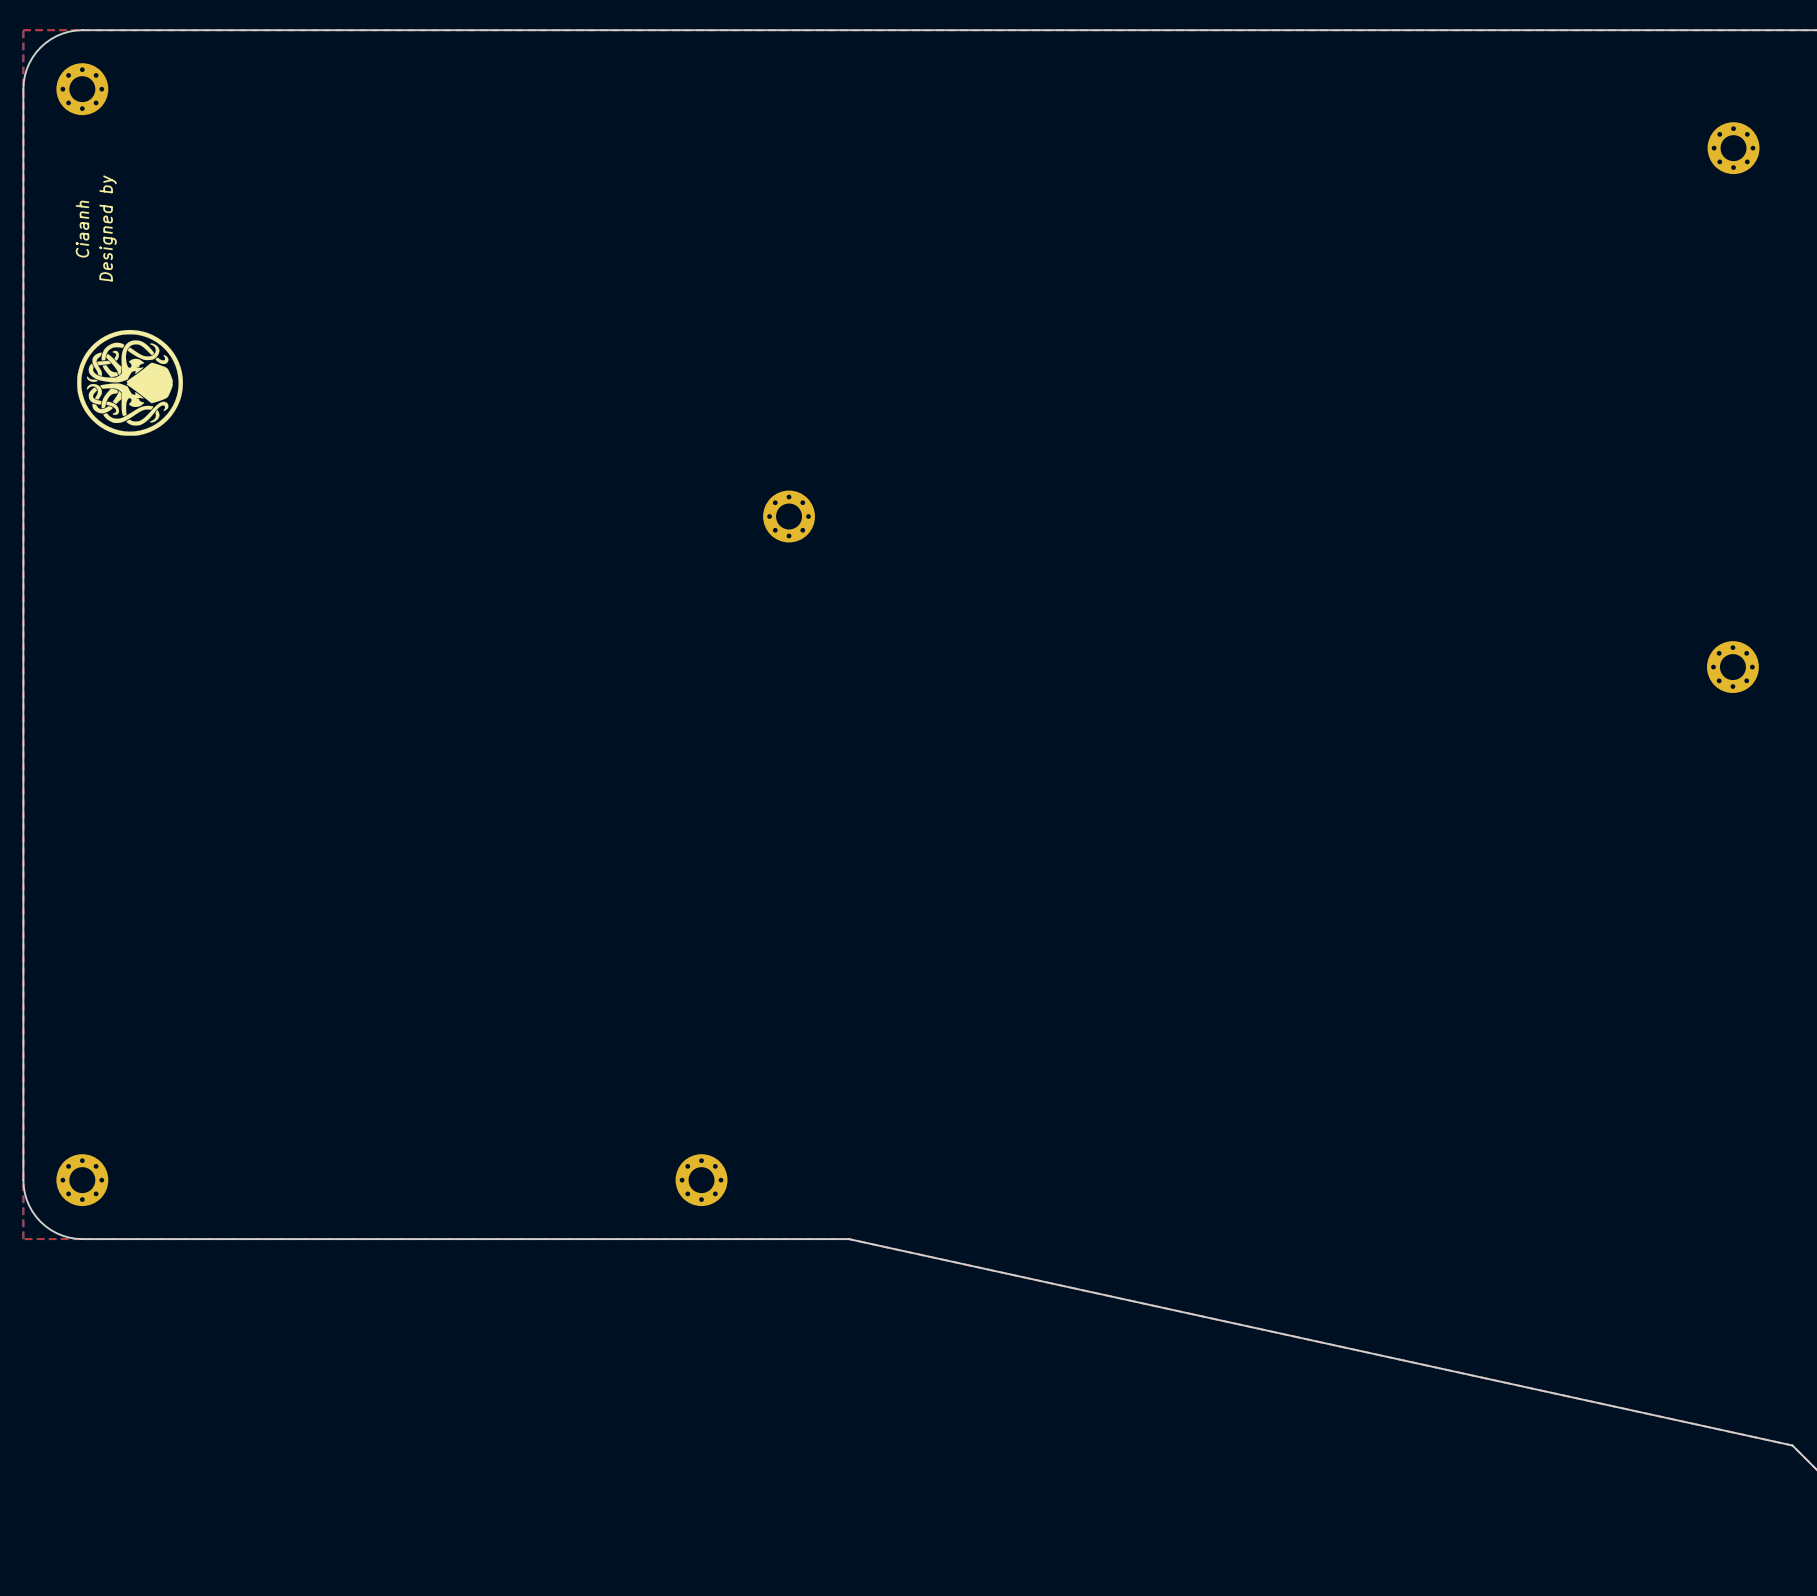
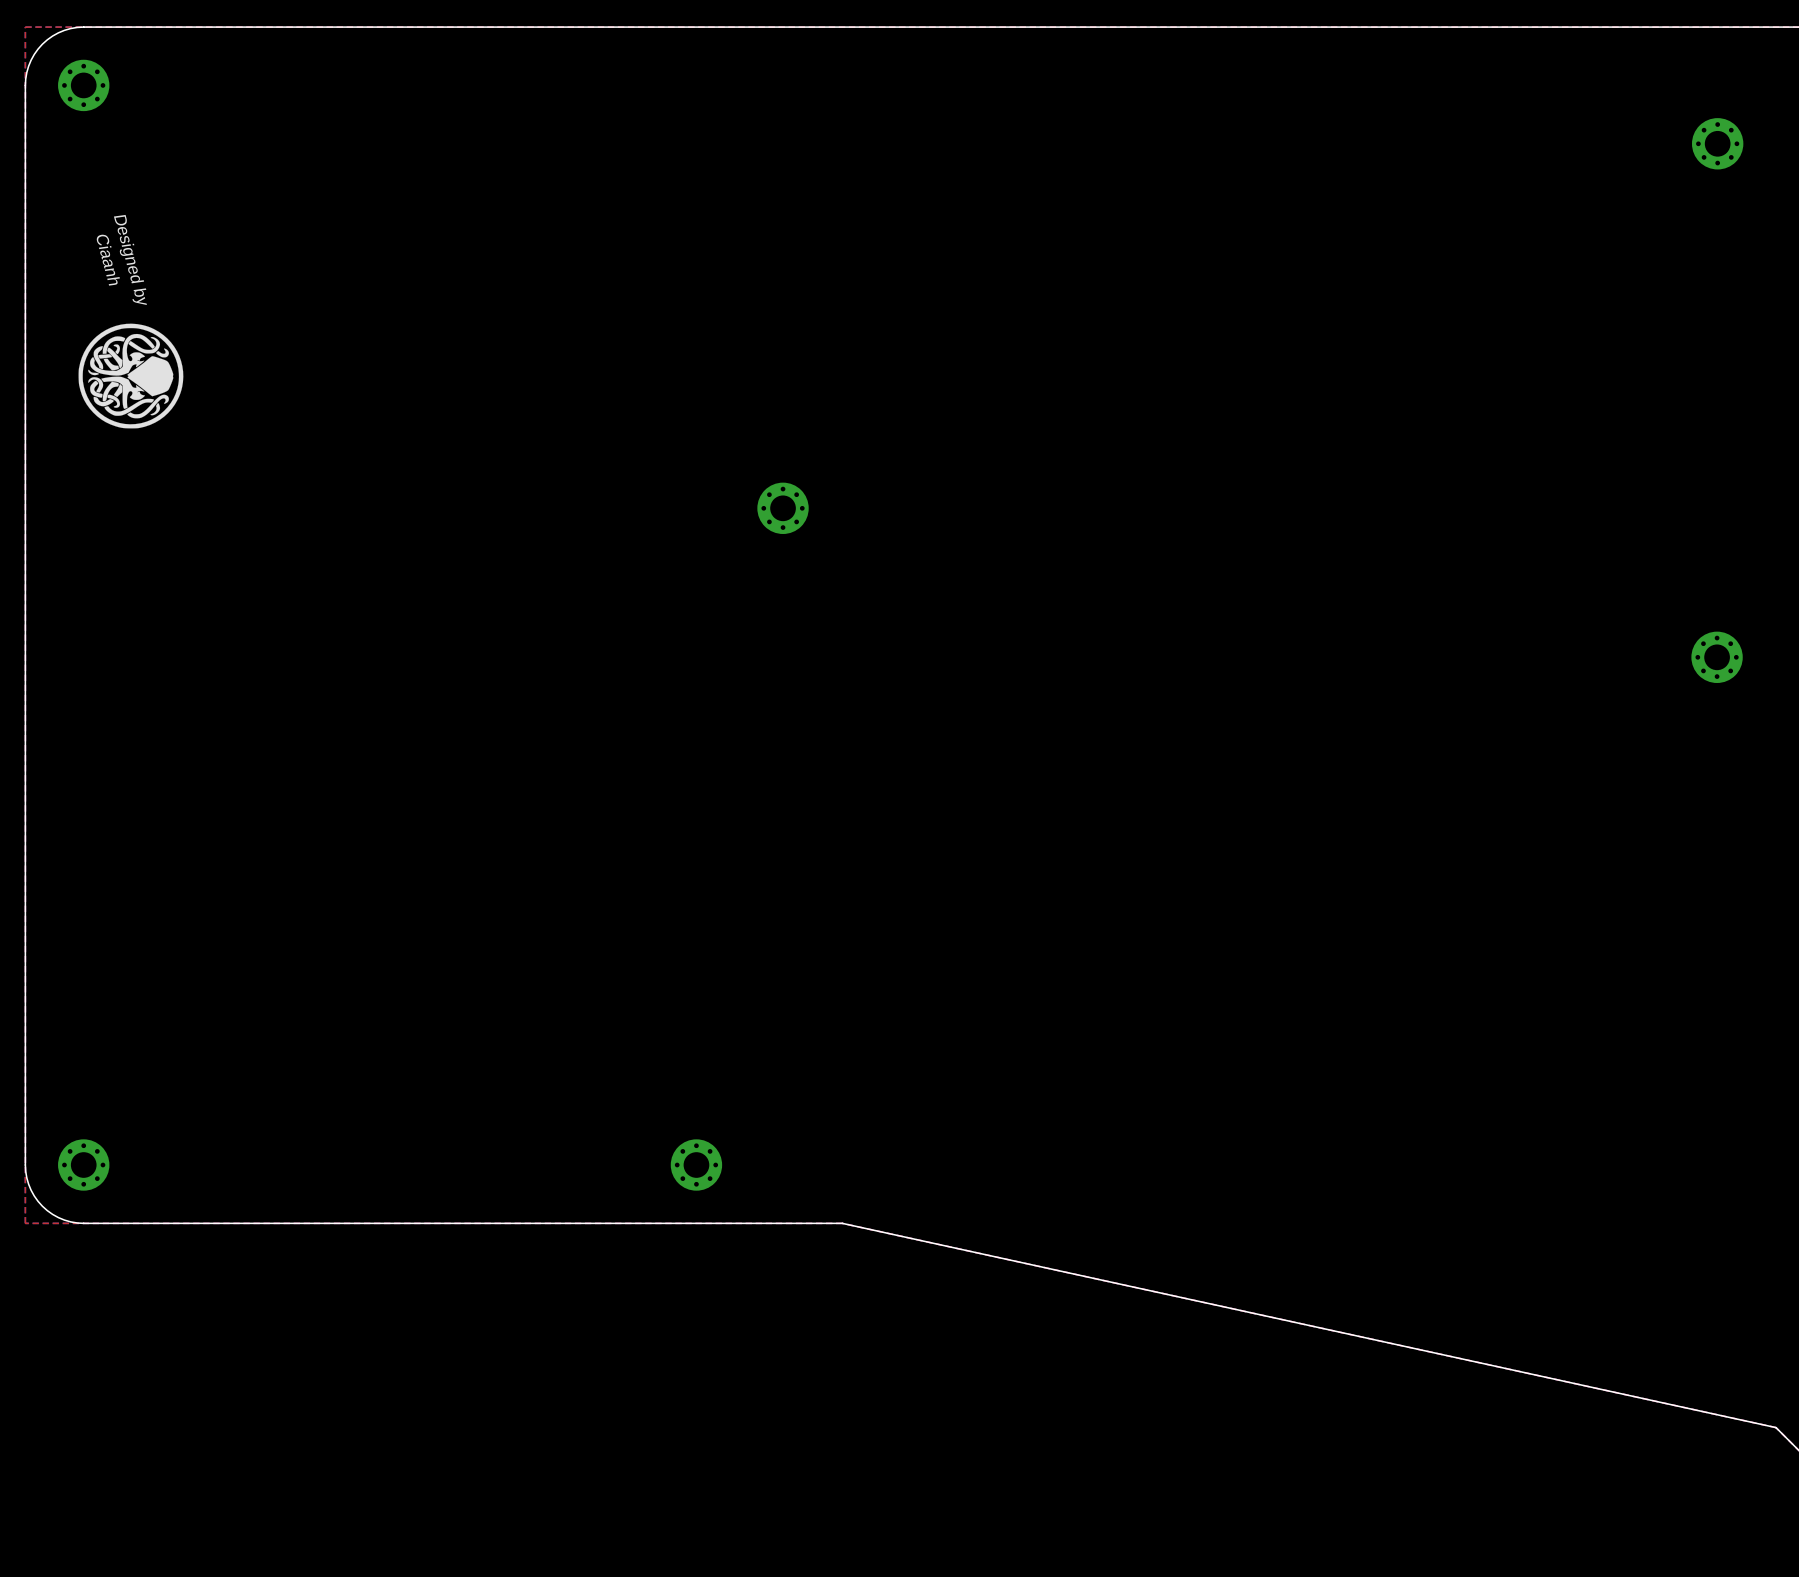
drawing shape: [75, 175, 184, 436] -> [78, 214, 184, 429]

